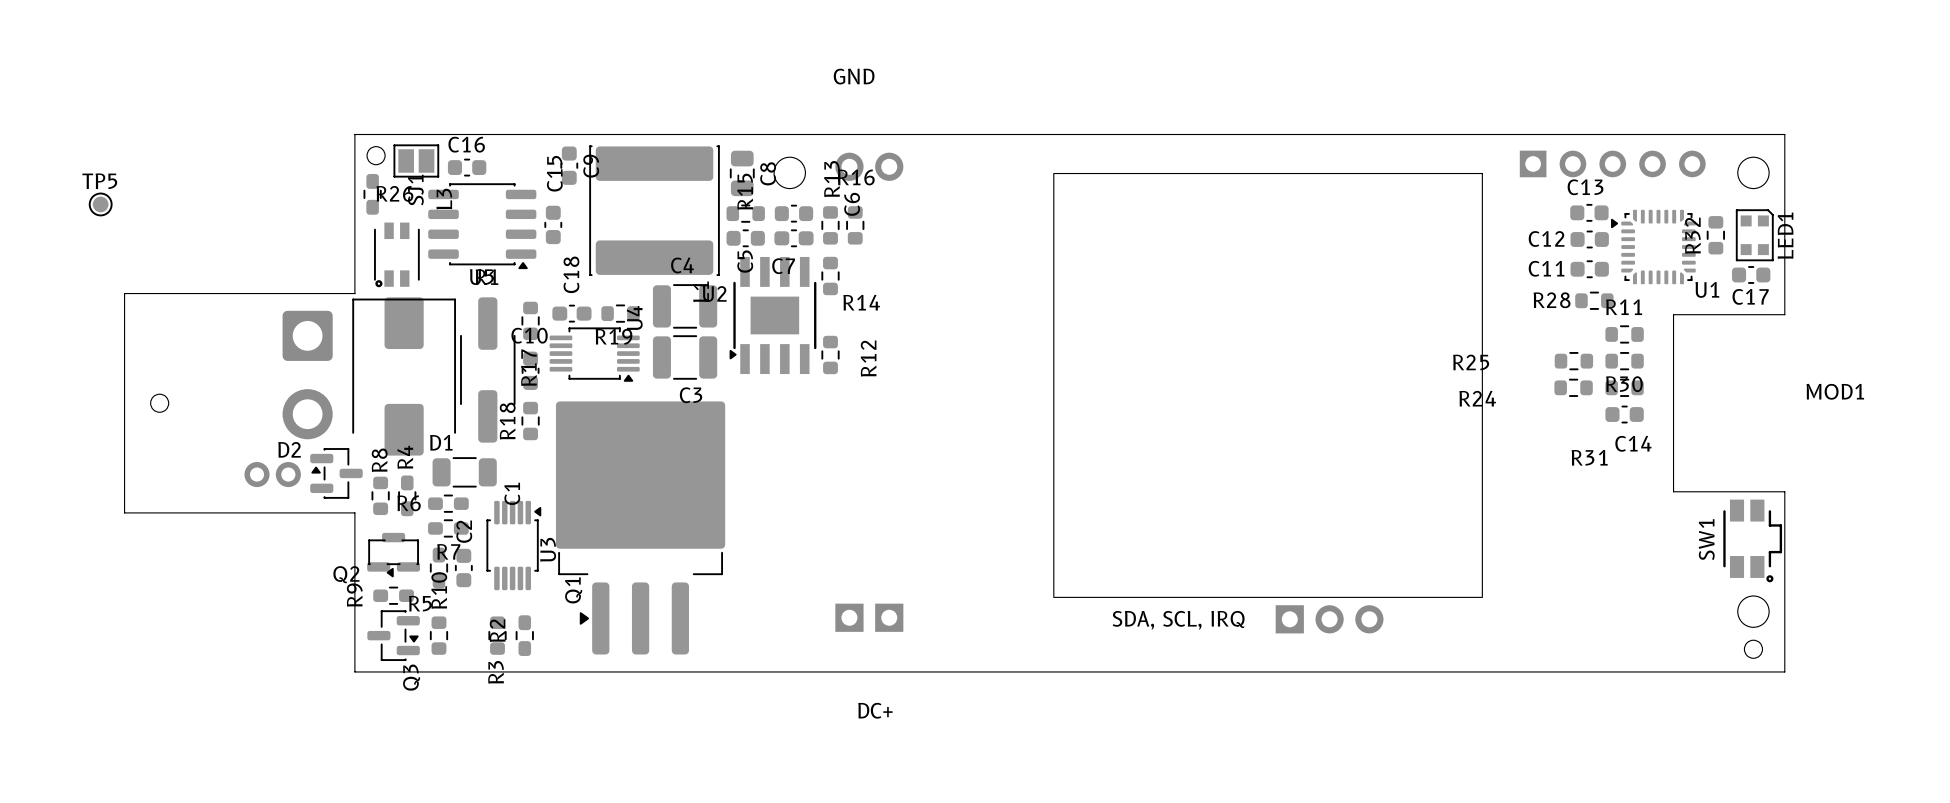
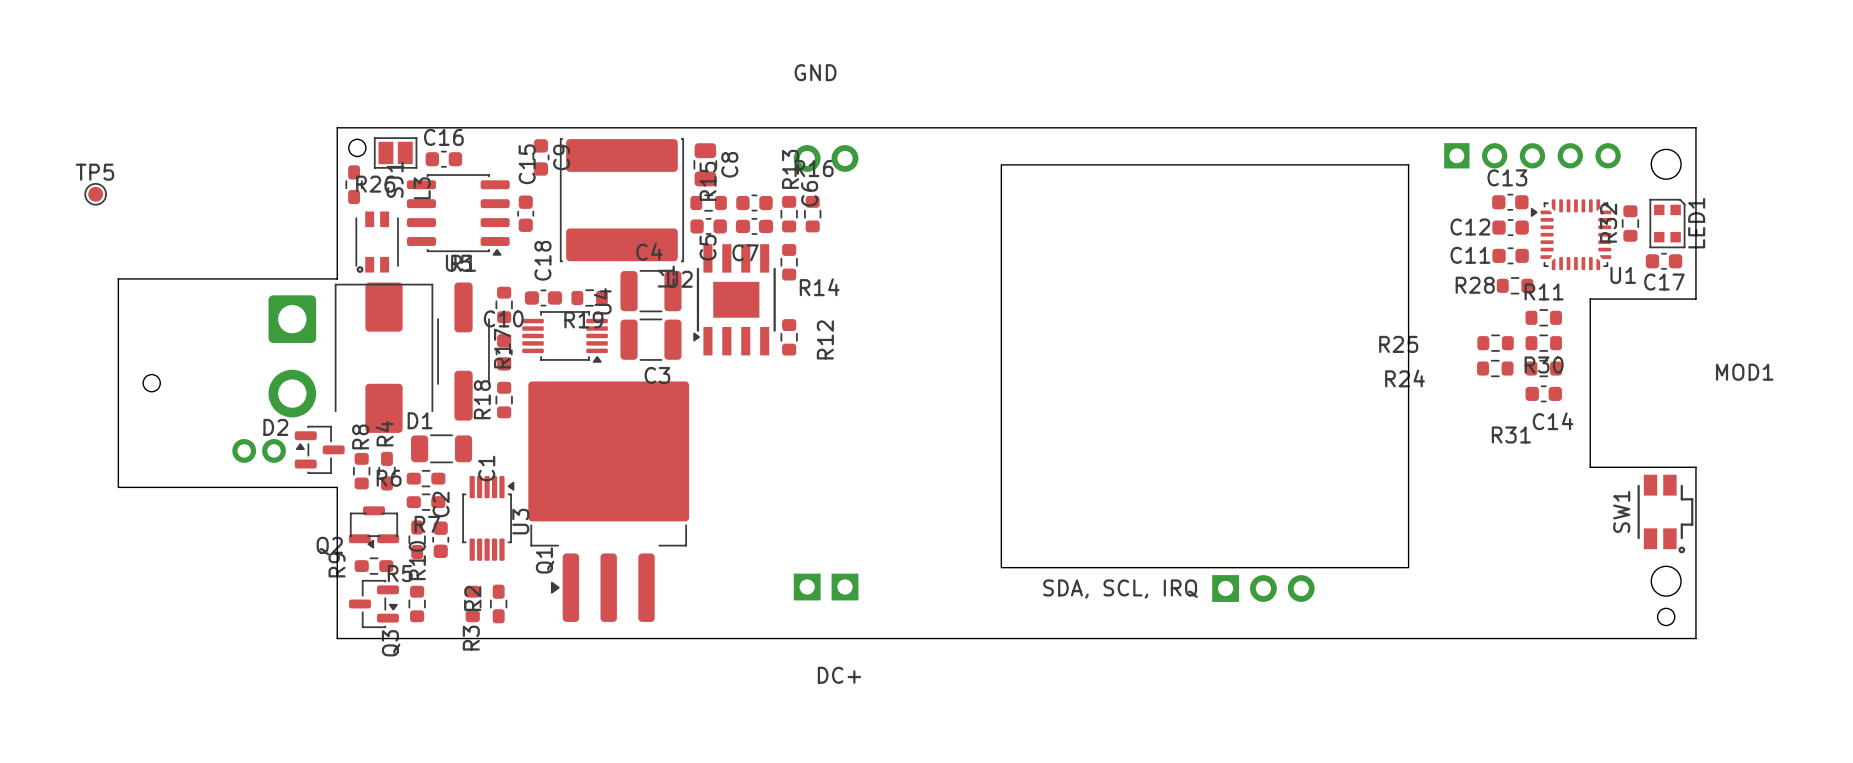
MOD1 footprint: [774, 152, 1786, 634] -> [793, 145, 1697, 602]

